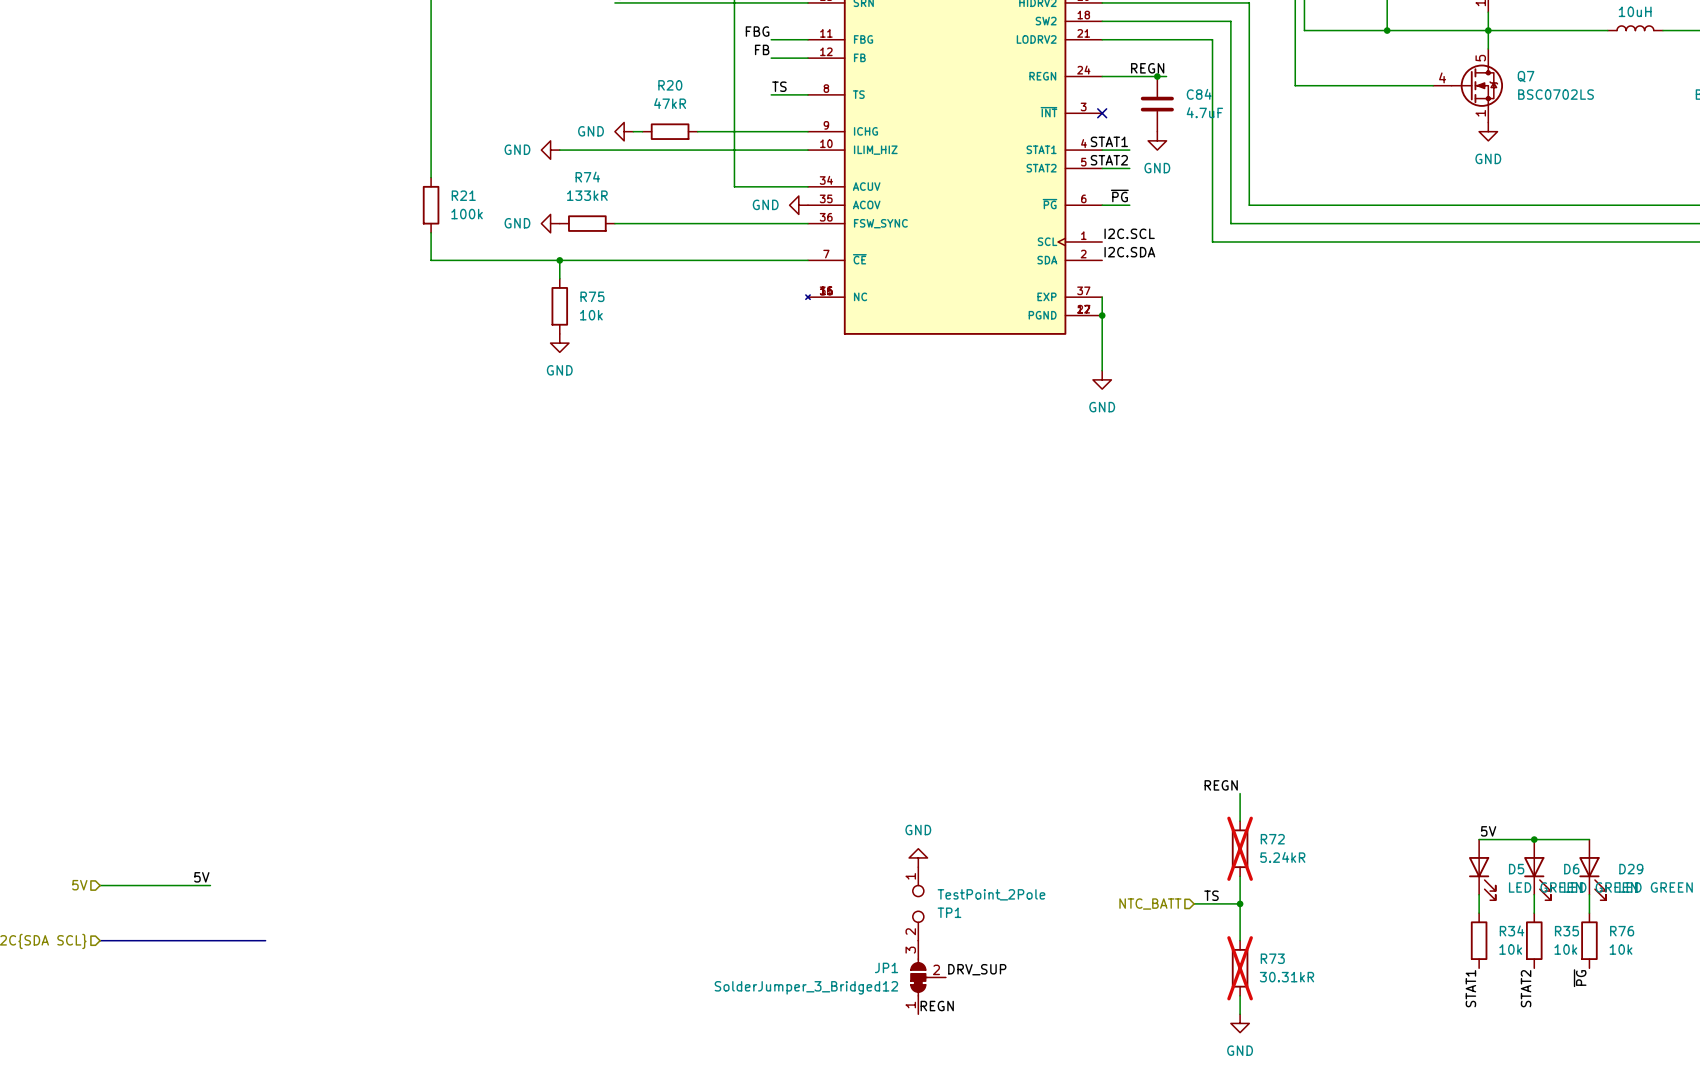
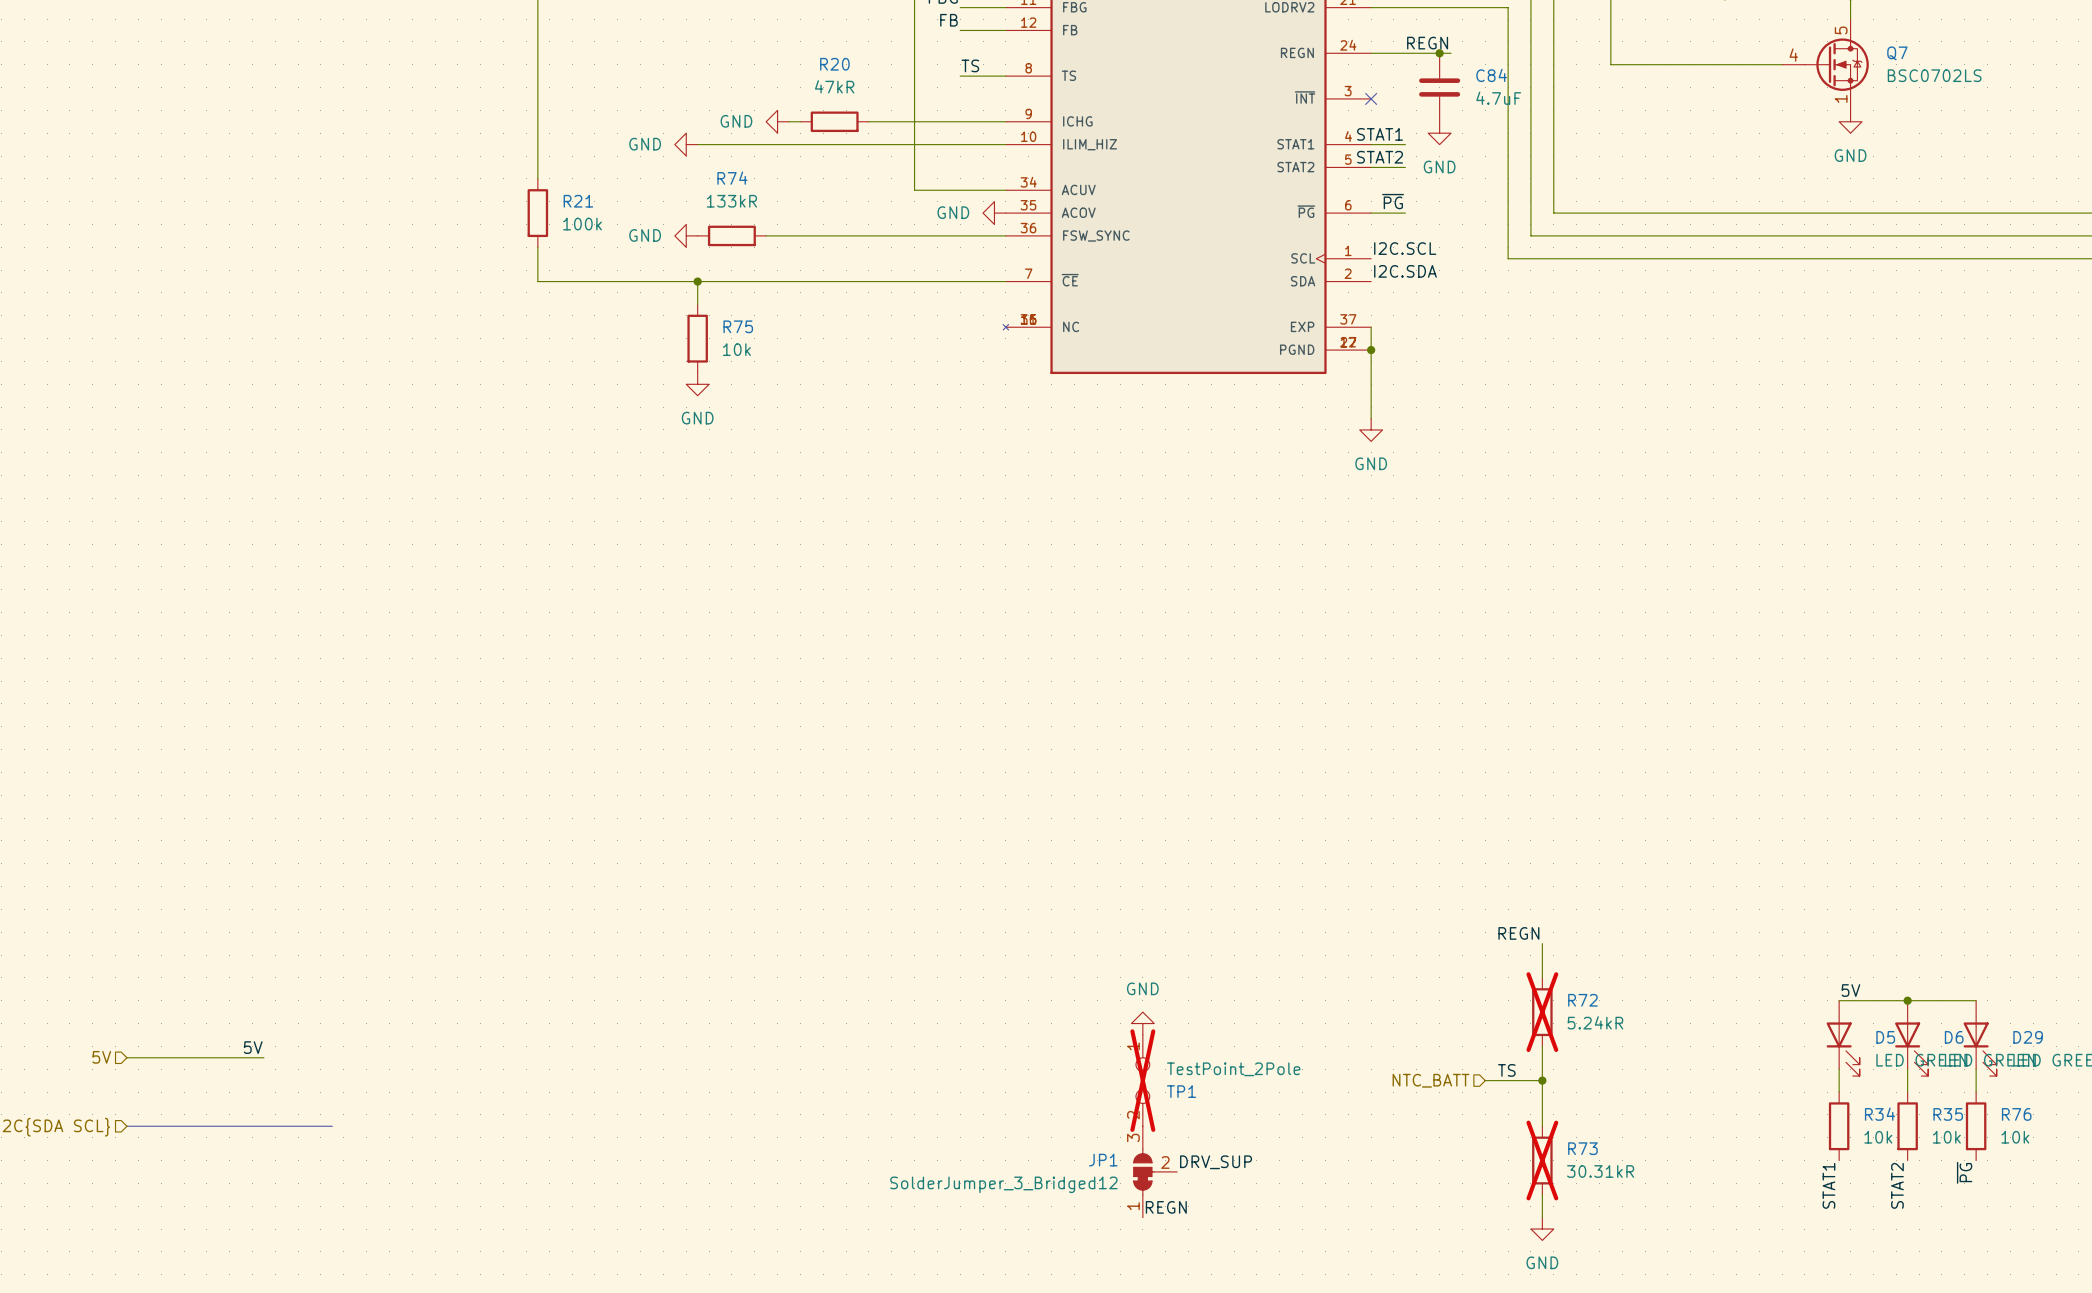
TP1 do-not-place cross: none -> (1142, 1080)

